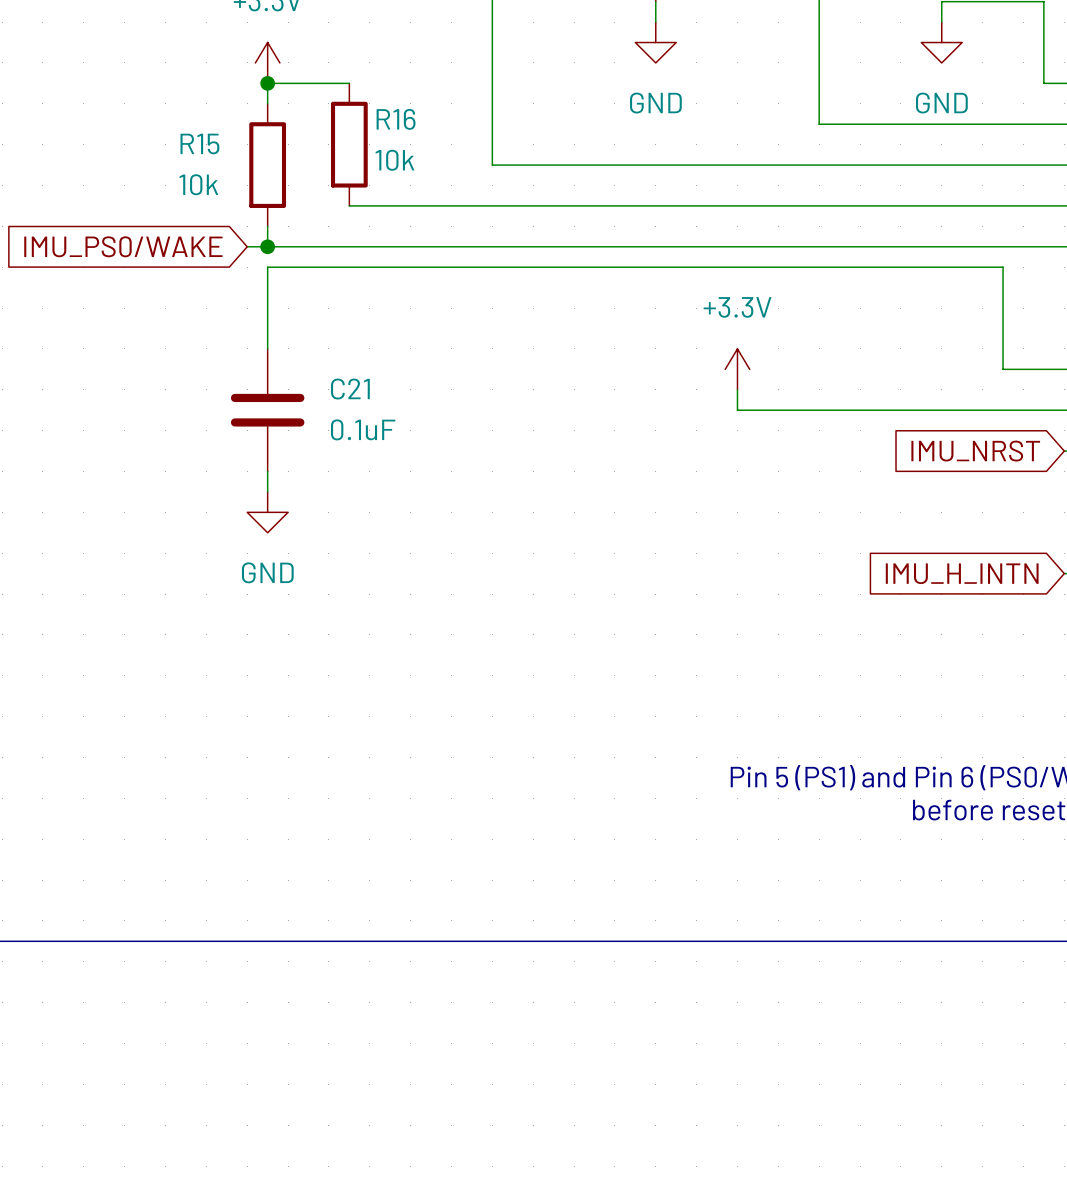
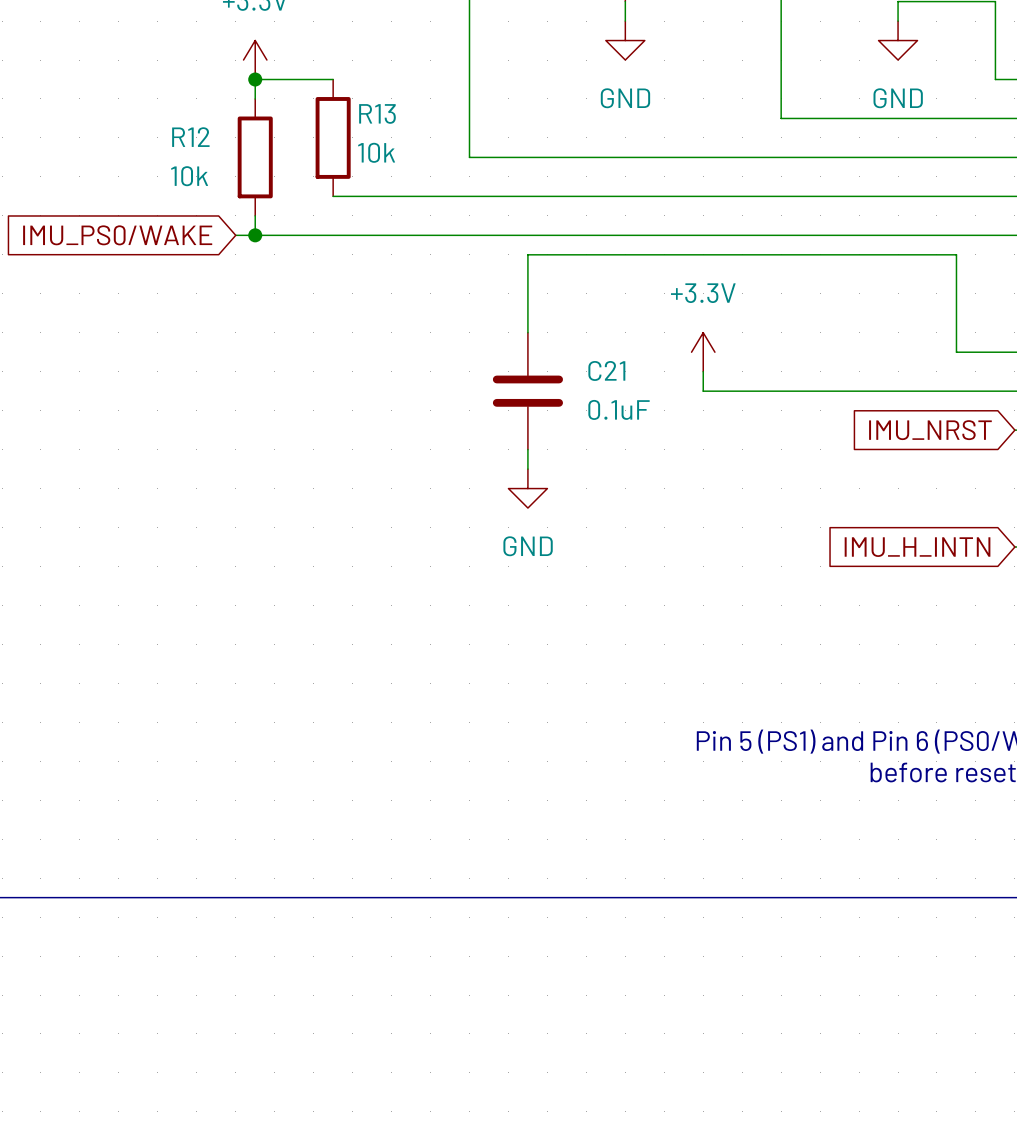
R16 name: R16 (396, 119) -> R13 (377, 113)
R15 name: R15 (199, 143) -> R12 (190, 137)
wire: (553, 267) (267, 267) (267, 348) -> (527, 254) (527, 332)
C21 position: (267, 410) -> (527, 391)
wire: (267, 471) (267, 491) -> (527, 449) (527, 469)
power symbol position: GND (267, 512) -> GND (527, 488)

